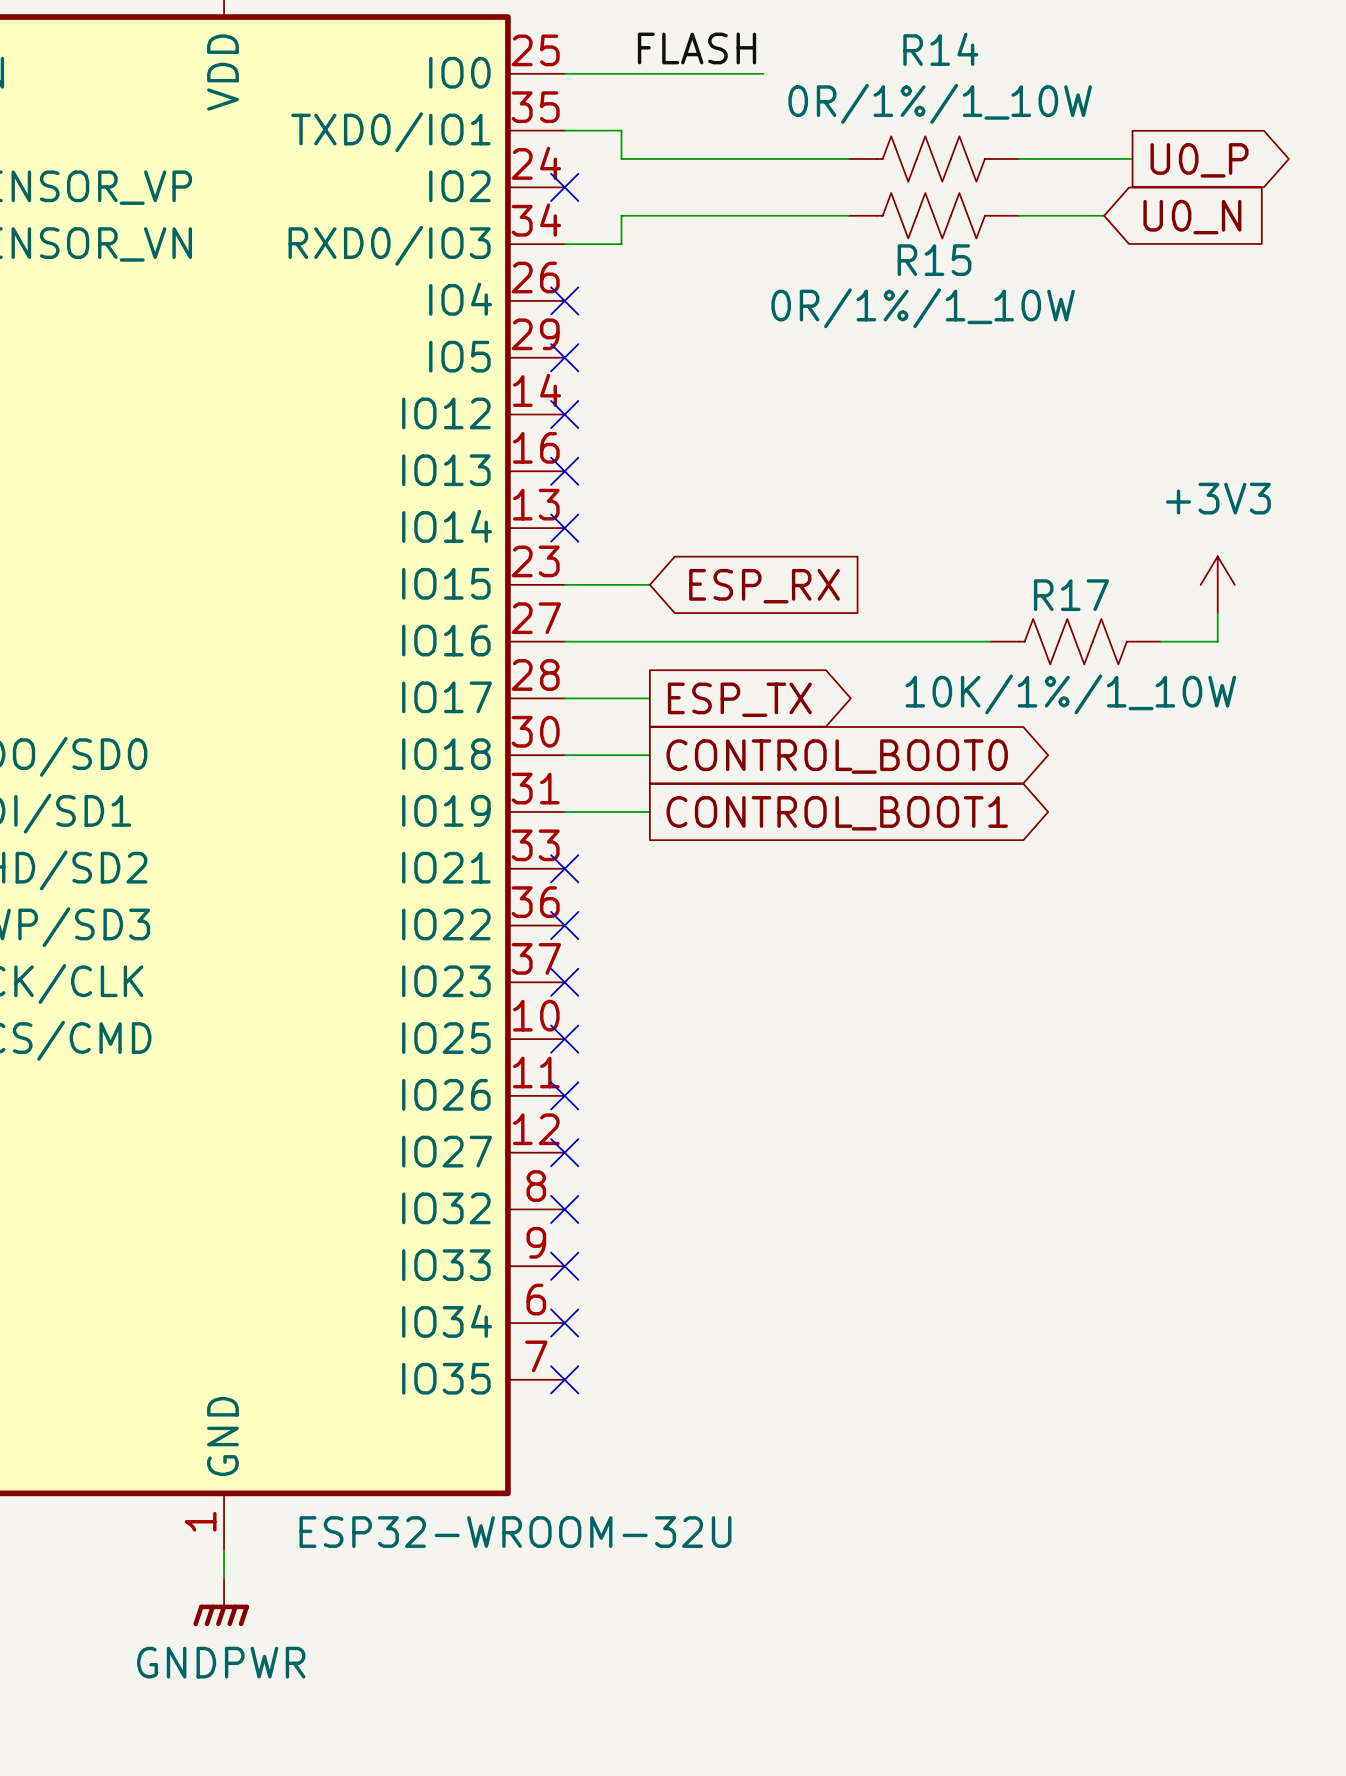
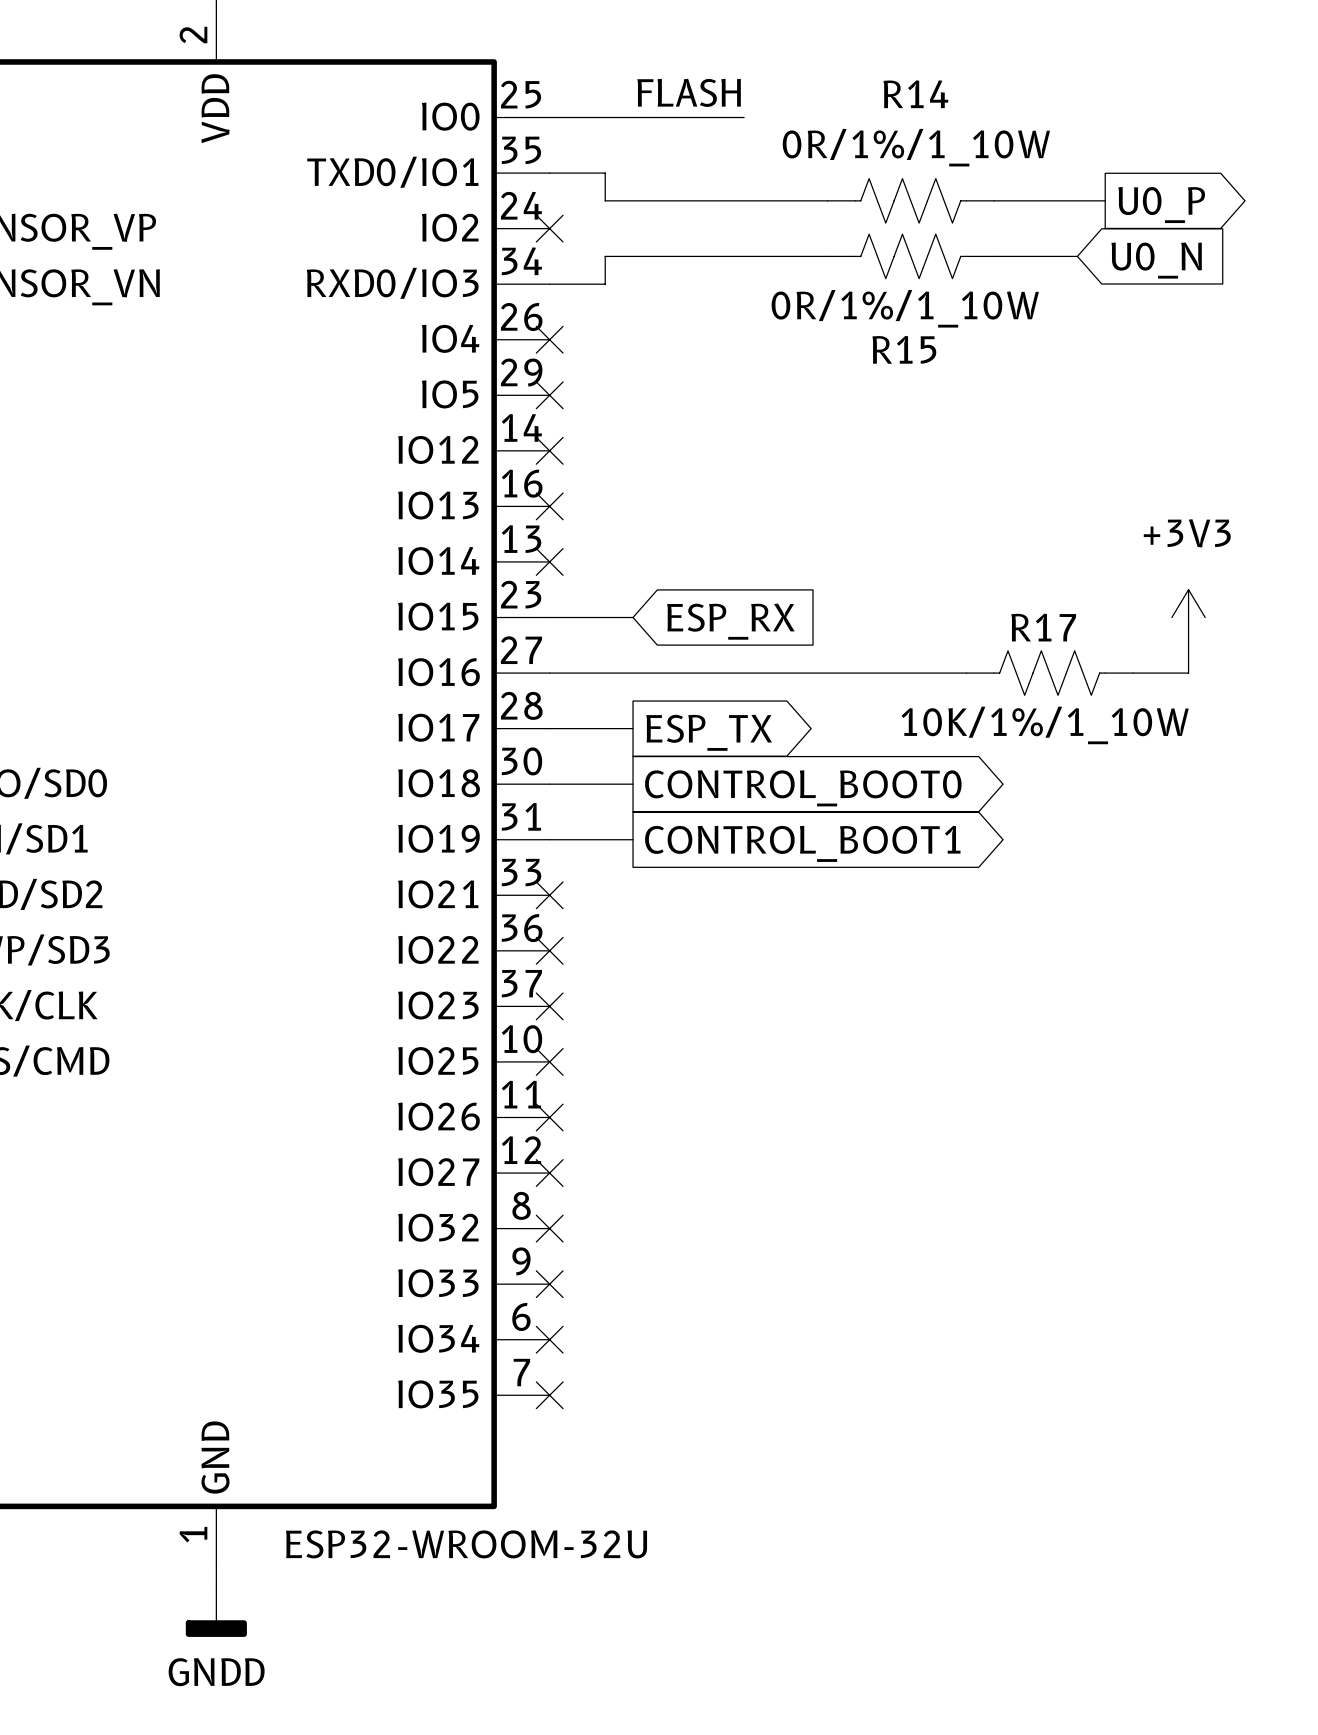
R15 name position: R15 (934, 260) -> R15 (904, 349)
R15 value position: 0R/1%/1_10W (923, 308) -> 0R/1%/1_10W (905, 308)
power symbol: GNDPWR (221, 1602) -> GNDD (216, 1613)

